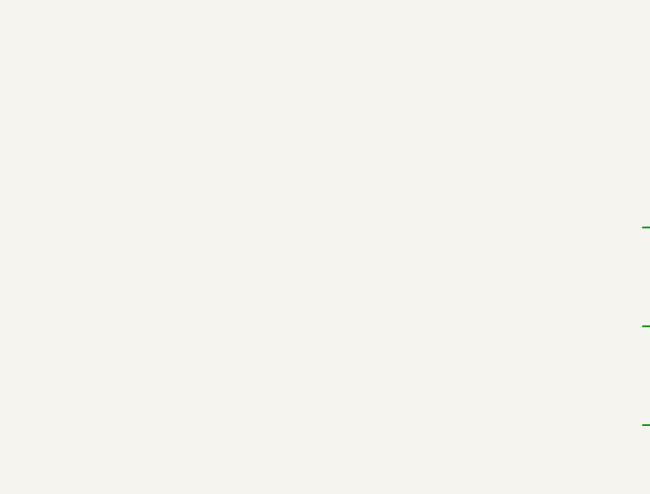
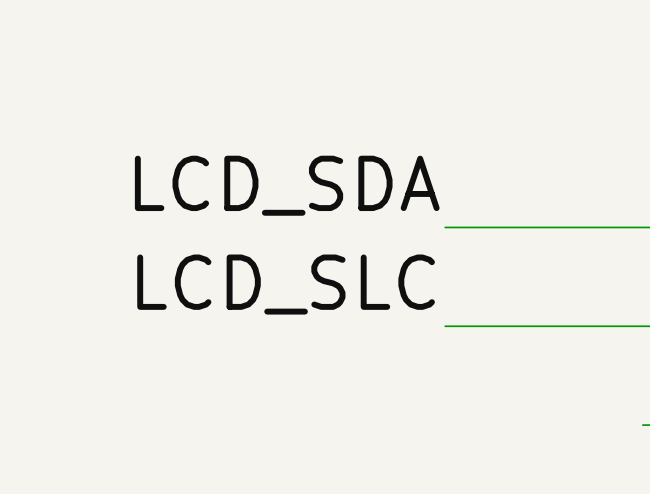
label: none -> LCD_SDA (287, 185)
wire: none -> (445, 227) (642, 227)
label: none -> LCD_SLC (286, 284)
wire: none -> (445, 326) (642, 326)

